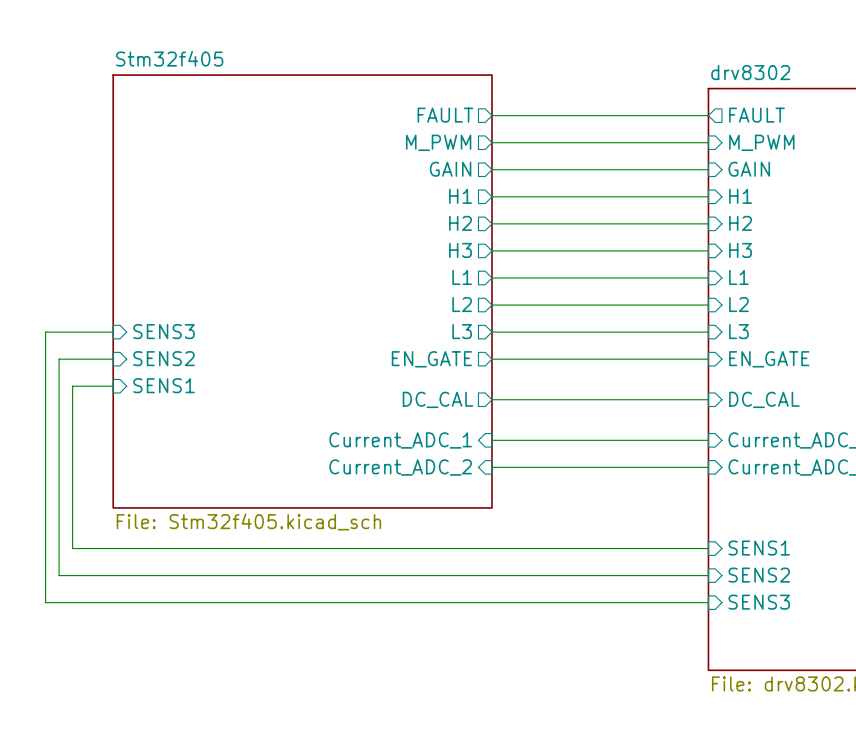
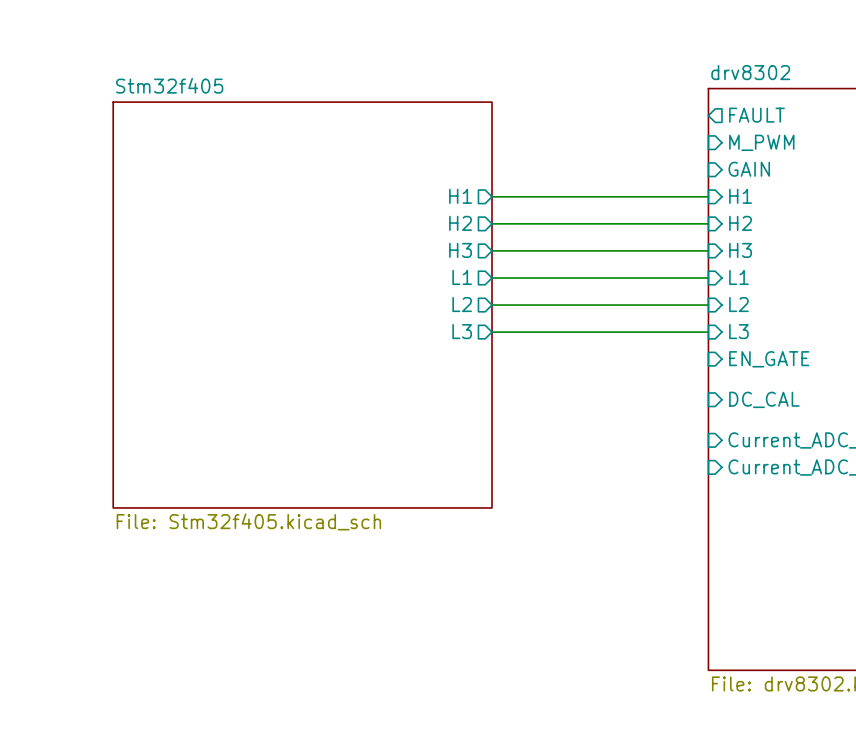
sheet Stm32f405 shape: [112, 74, 493, 509] -> [112, 101, 493, 509]
sheet pin: FAULT (445, 115) -> none
wire: (492, 115) (708, 115) -> none
sheet pin: M_PWM (438, 142) -> none
wire: (492, 142) (708, 142) -> none
sheet pin: GAIN (450, 169) -> none
wire: (492, 169) (708, 169) -> none
sheet pin: SENS3 (163, 331) -> none
wire: (113, 332) (45, 332) (45, 602) (708, 602) -> none
sheet pin: SENS2 (163, 358) -> none
wire: (113, 359) (59, 359) (59, 575) (708, 575) -> none
sheet pin: EN_GATE (431, 359) -> none
wire: (492, 359) (708, 359) -> none
sheet pin: SENS1 (163, 385) -> none
wire: (113, 386) (72, 386) (72, 548) (708, 548) -> none
sheet pin: DC_CAL (437, 399) -> none
wire: (492, 399) (708, 399) -> none
sheet pin: Current_ADC_1 (400, 440) -> none
wire: (492, 440) (708, 440) -> none
sheet pin: Current_ADC_2 (400, 467) -> none
wire: (492, 467) (708, 467) -> none
sheet pin: SENS1 (759, 548) -> none
sheet pin: SENS2 (759, 575) -> none
sheet pin: SENS3 (759, 602) -> none

